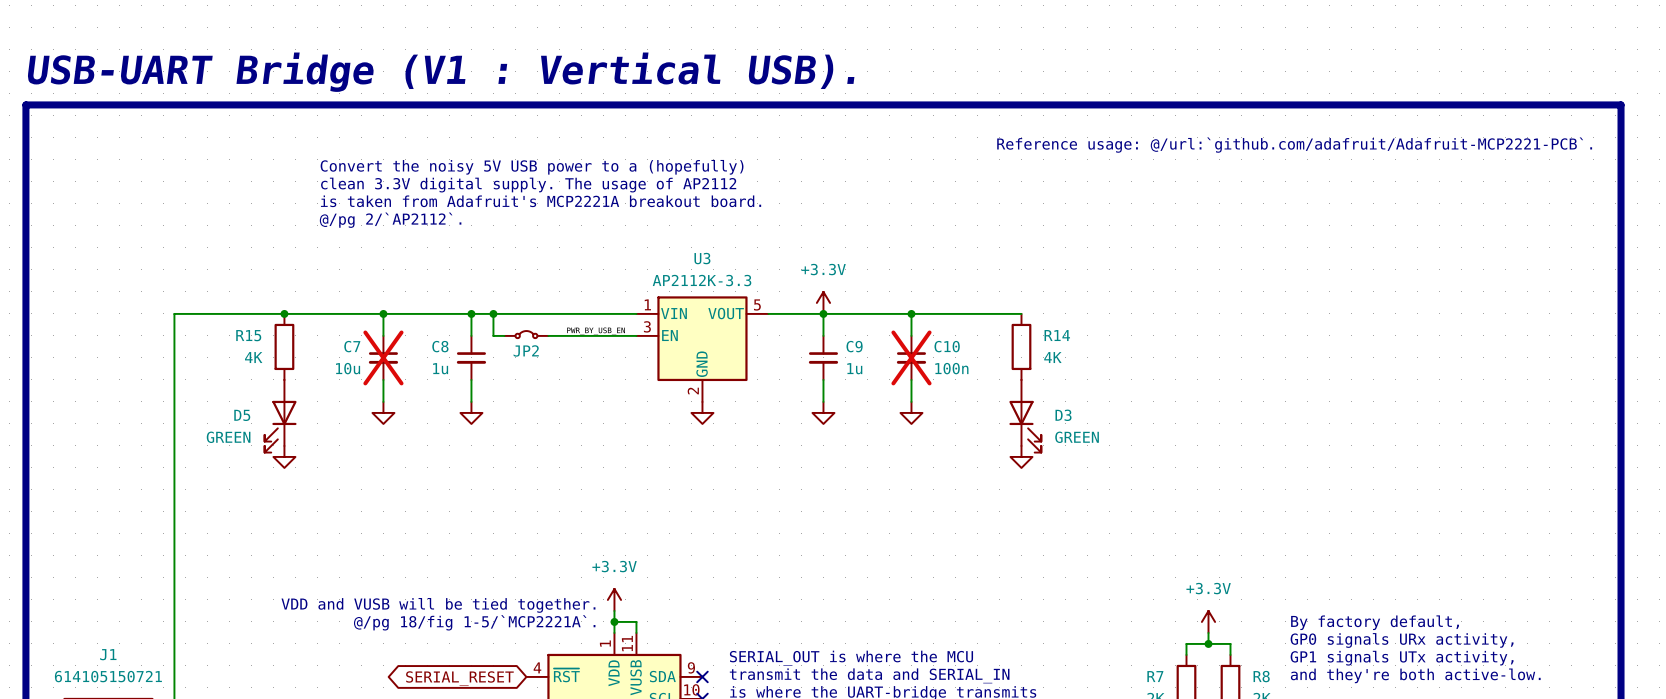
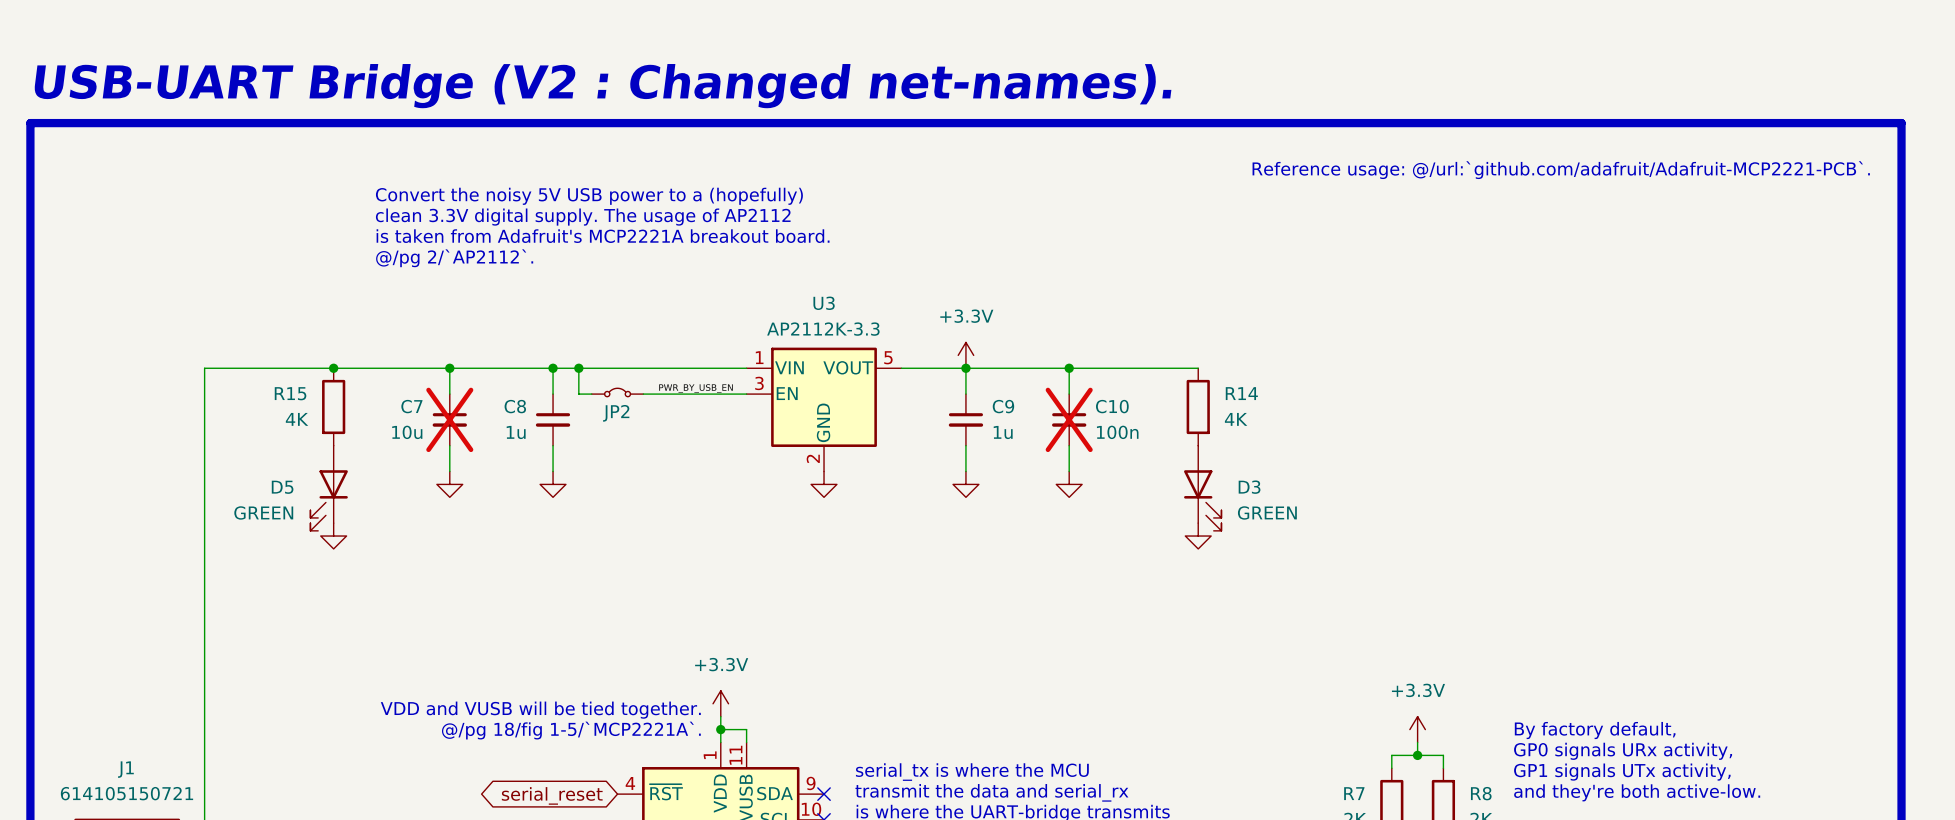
text: USB-UART Bridge (V1 : Vertical USB). (440, 72) -> USB-UART Bridge (V2 : Changed net-names). (602, 86)
text: SERIAL_OUT is where the MCU (851, 658) -> serial_tx is where the MCU (972, 772)
text: transmit the data and SERIAL_IN (869, 675) -> transmit the data and serial_rx (991, 792)
global label: SERIAL_RESET (459, 678) -> serial_reset (552, 795)

